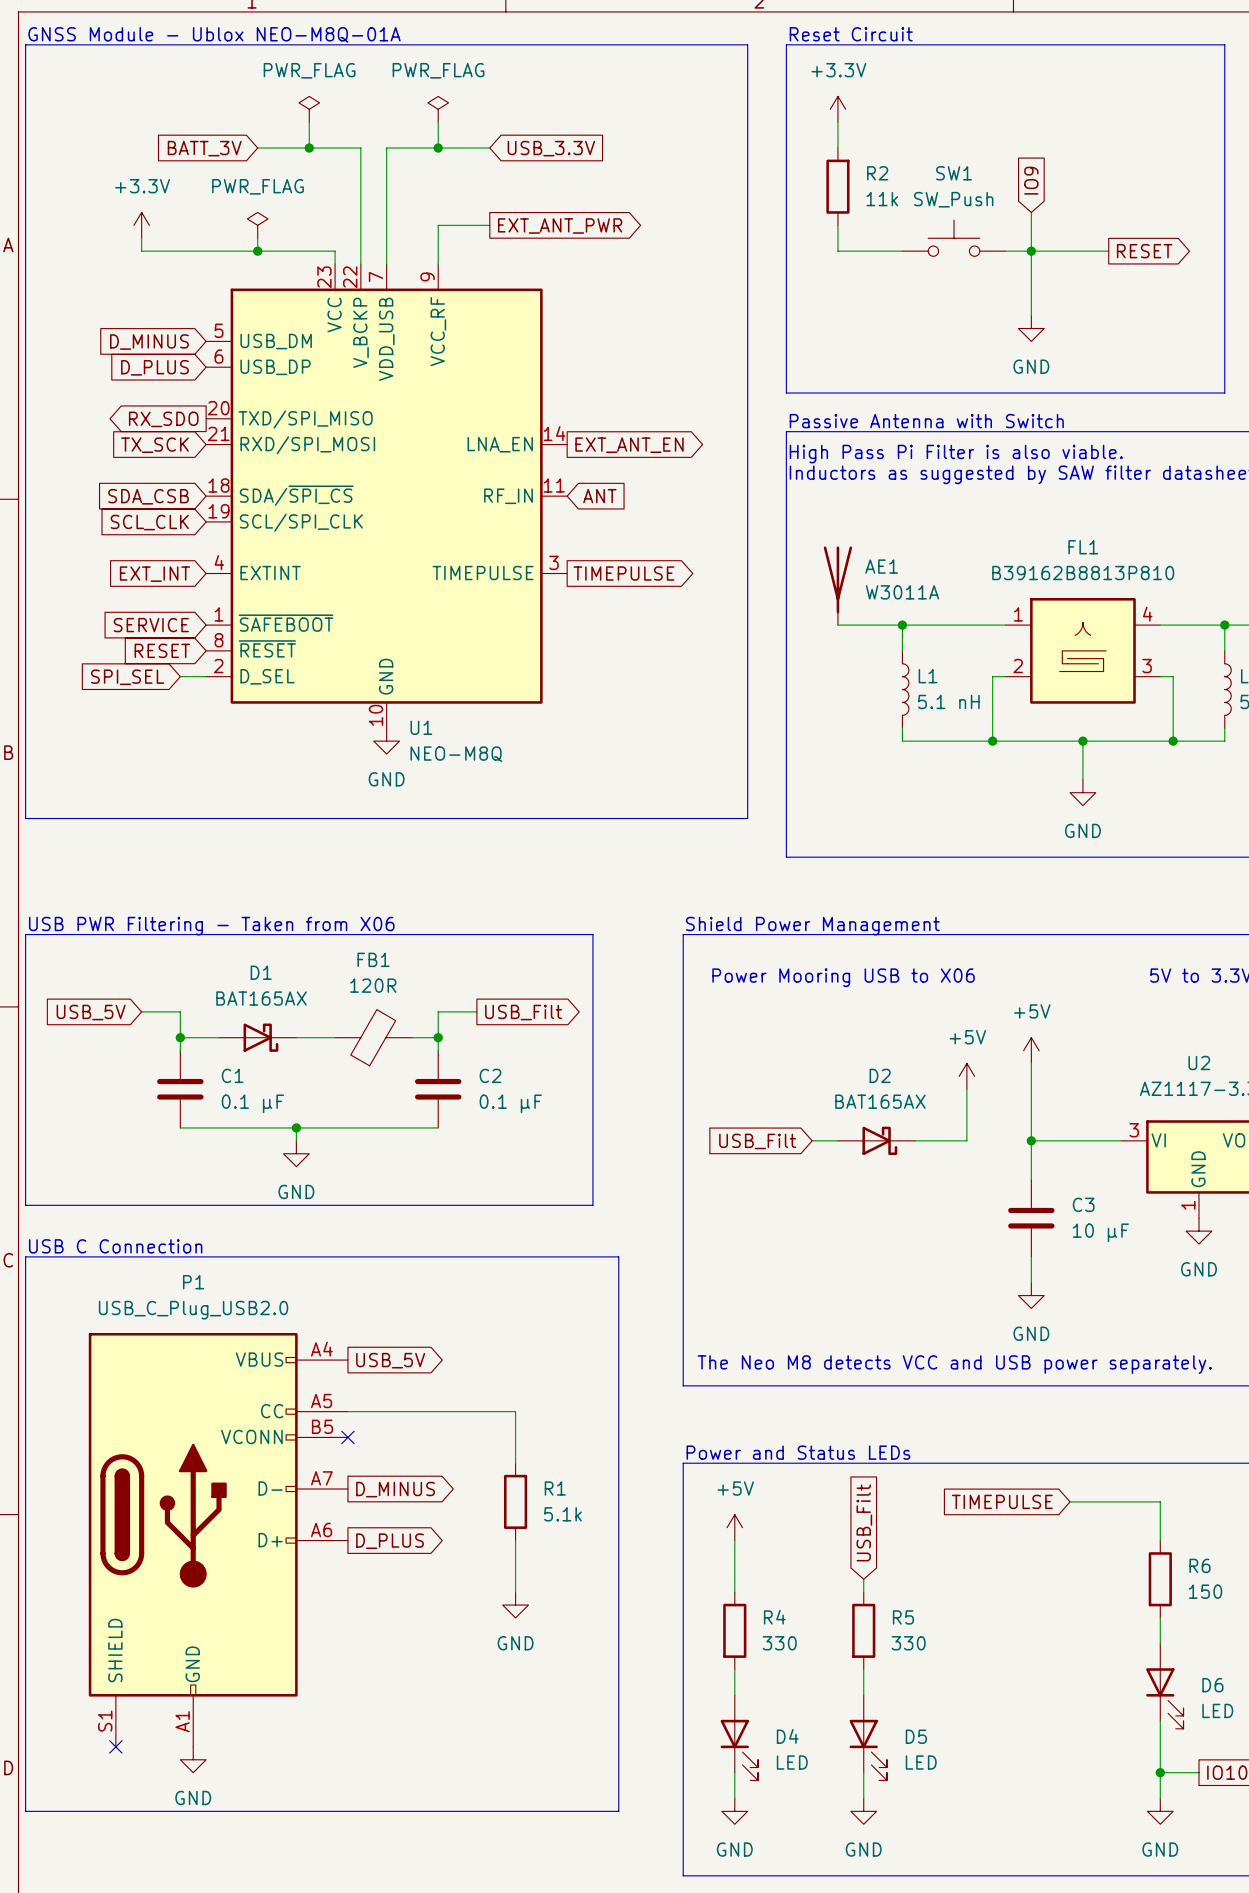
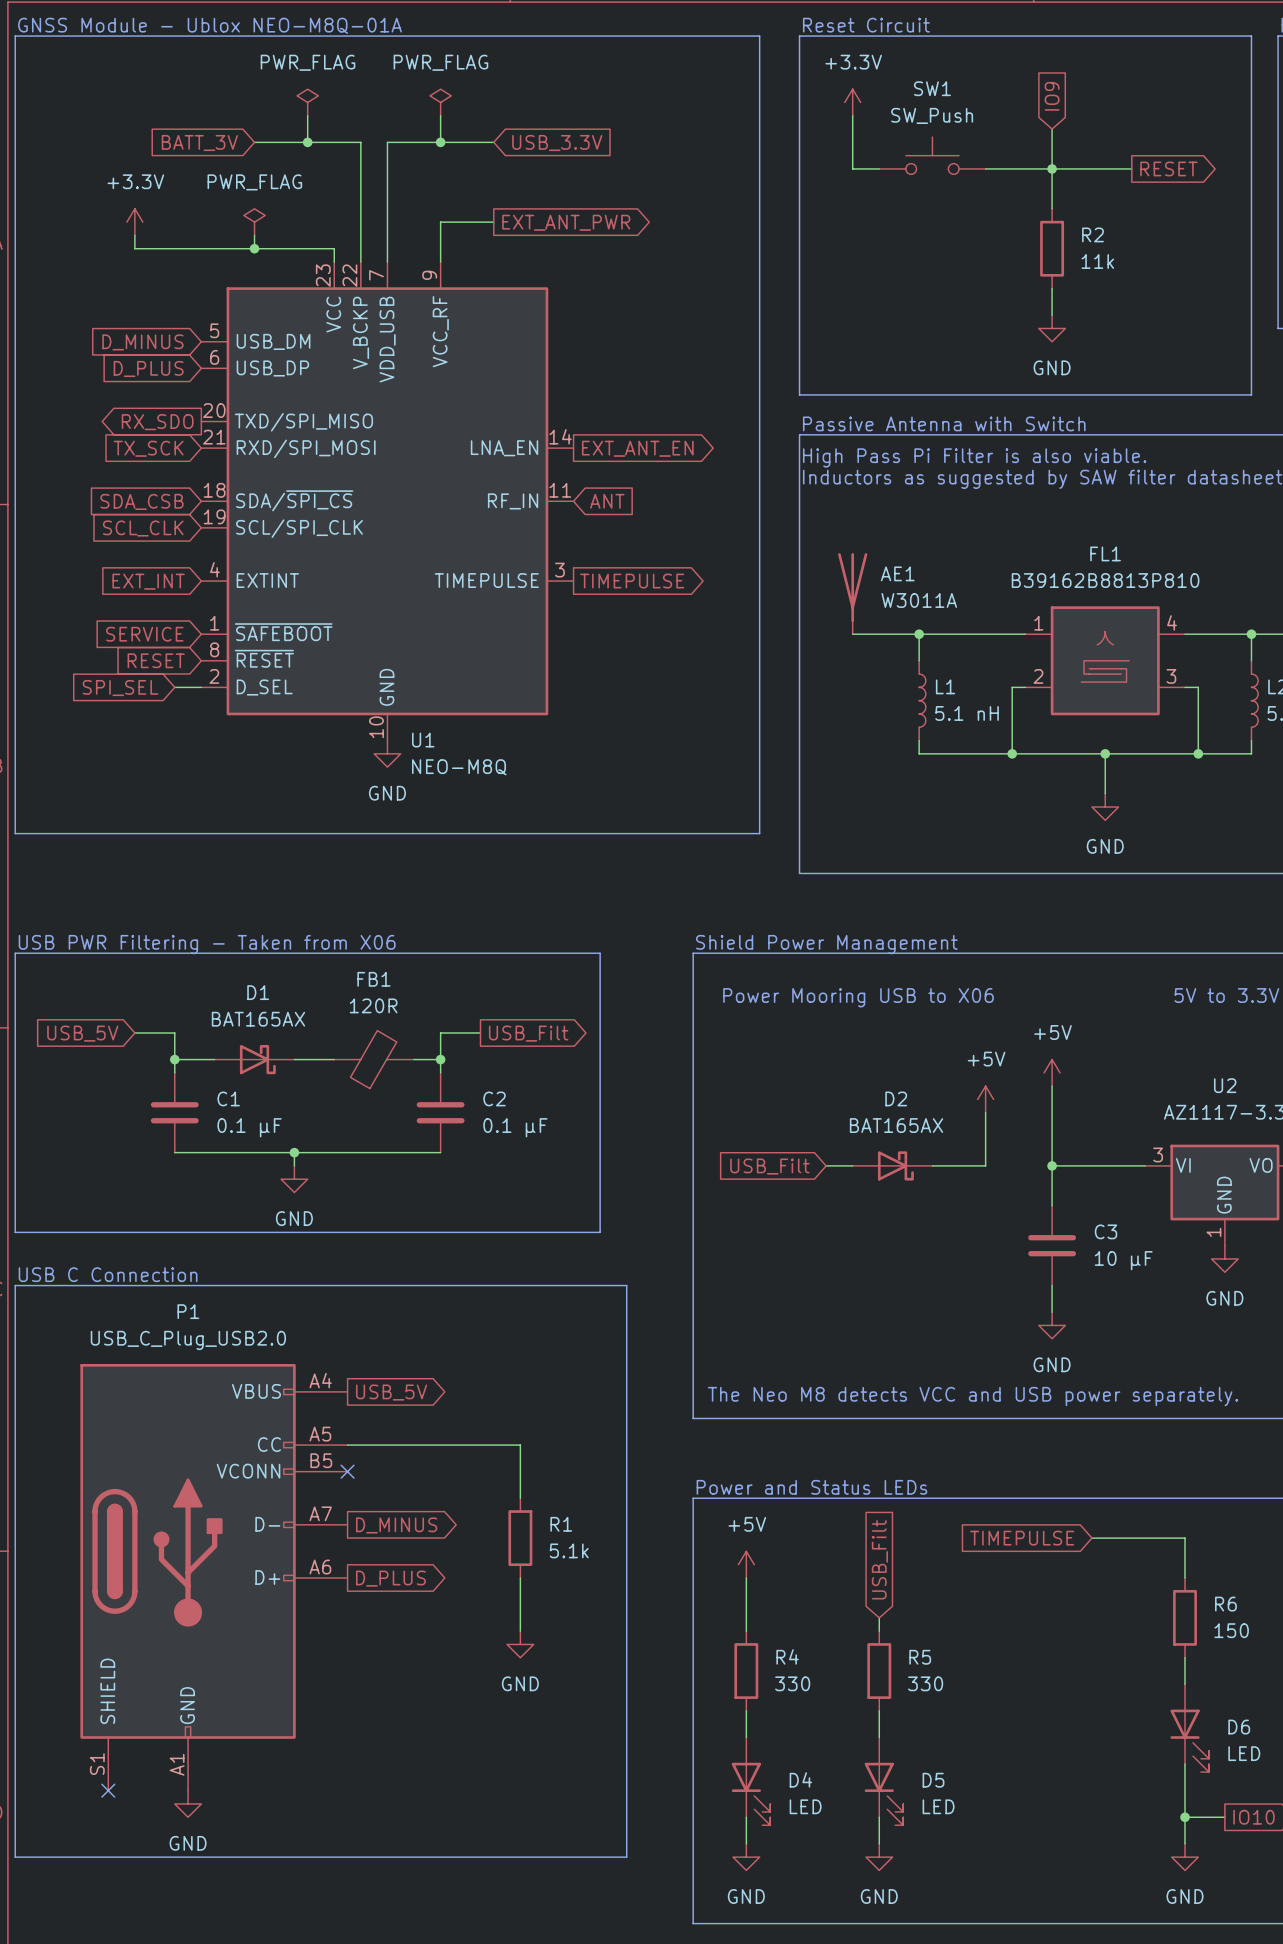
wire: none -> (852, 142) (852, 168) (879, 168)
wire: none -> (985, 168) (1131, 168)
junction: none -> (1052, 168)
global label position: IO9 (1031, 180) -> IO9 (1052, 96)
R2 position: (837, 186) -> (1052, 248)
wire: (1031, 212) (1031, 289) -> (1052, 208) (1052, 129)
wire: (837, 225) (837, 251) (902, 251) -> none
SW1 position: (953, 238) -> (932, 155)
wire: (1005, 251) (1108, 251) -> none
junction: (1031, 251) -> none
global label position: RESET (1144, 251) -> RESET (1168, 168)

